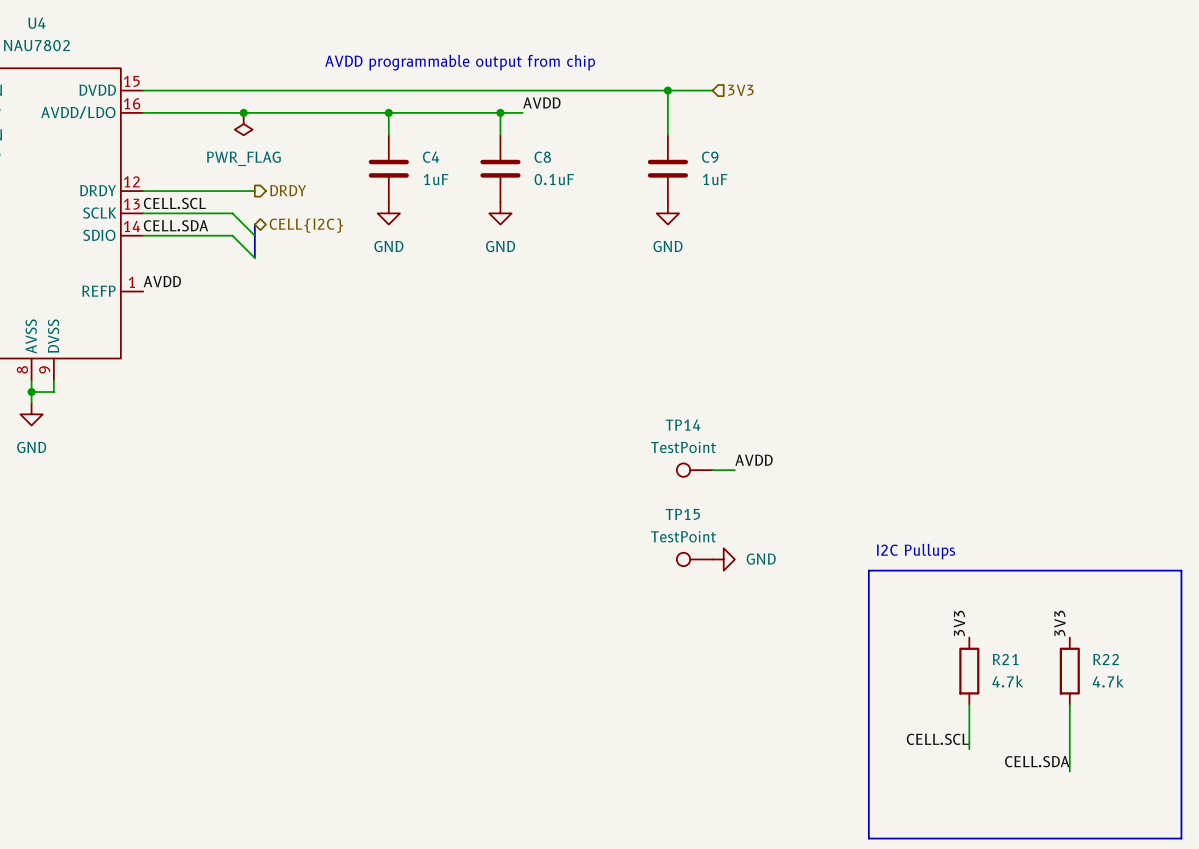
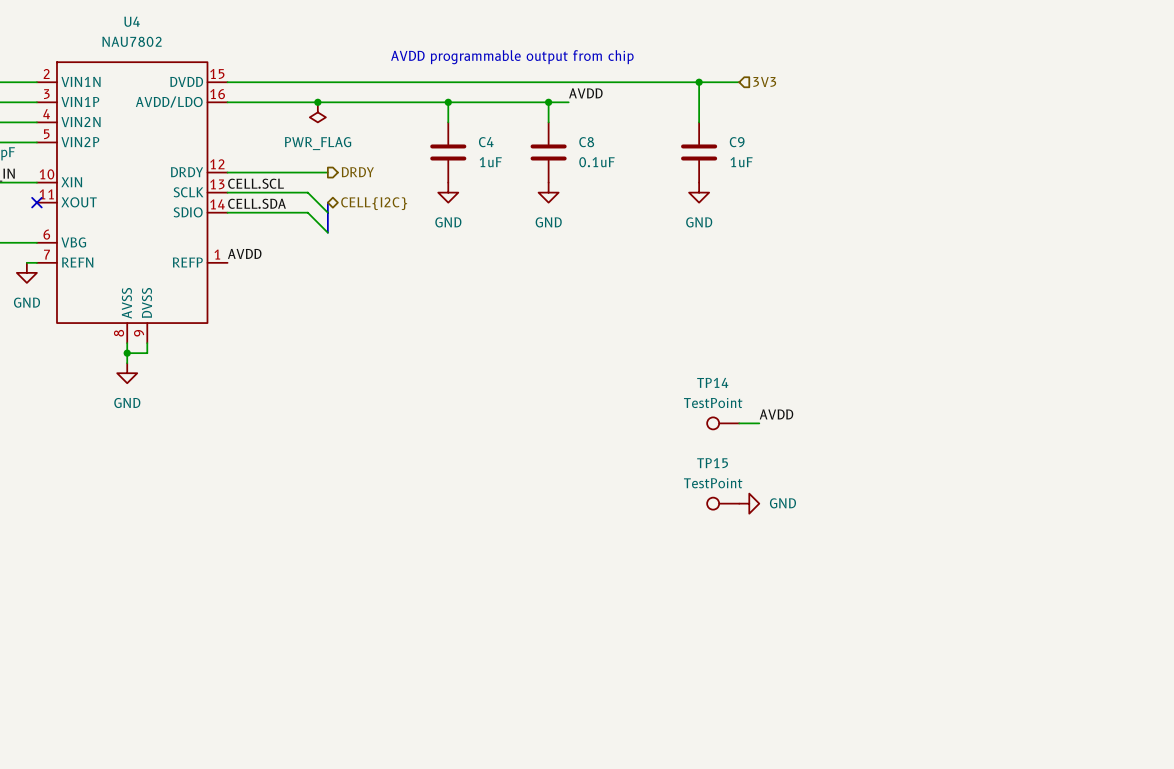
text: I2C Pullups (915, 551) -> none
line: (868, 570) (1181, 570) (1181, 838) (868, 838) (868, 570) -> none
label: 3V3 (959, 623) -> none
label: 3V3 (1059, 623) -> none
R21: 4.7k (969, 671) -> none
R22: 4.7k (1069, 671) -> none
wire: (969, 704) (969, 749) -> none
wire: (1069, 704) (1069, 771) -> none
label: CELL.SCL (937, 739) -> none
label: CELL.SDA (1037, 761) -> none

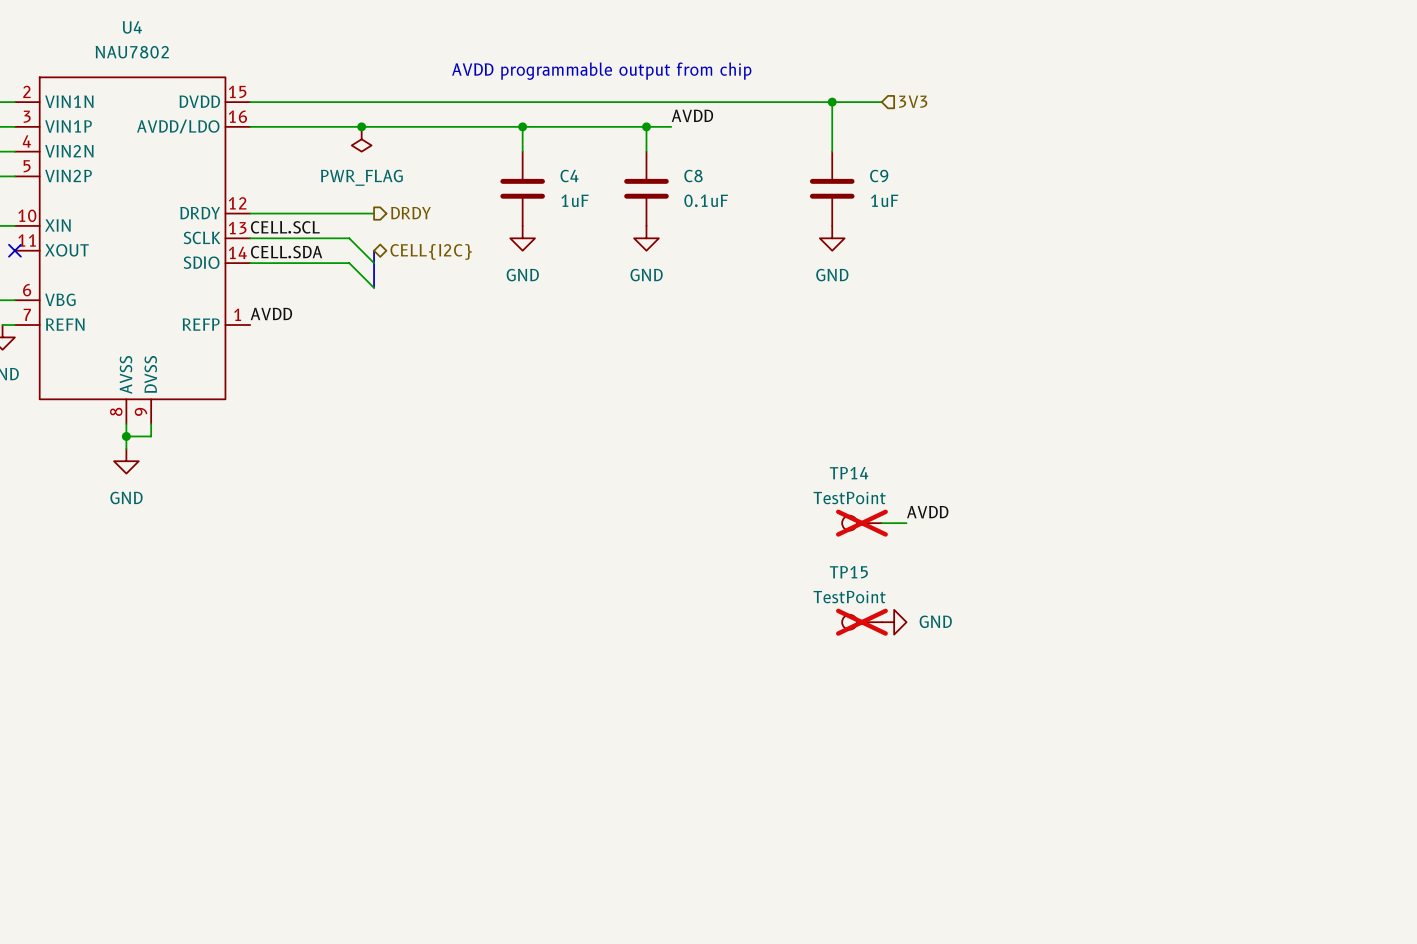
TP14 do-not-place cross: none -> (861, 523)
TP15 do-not-place cross: none -> (861, 622)

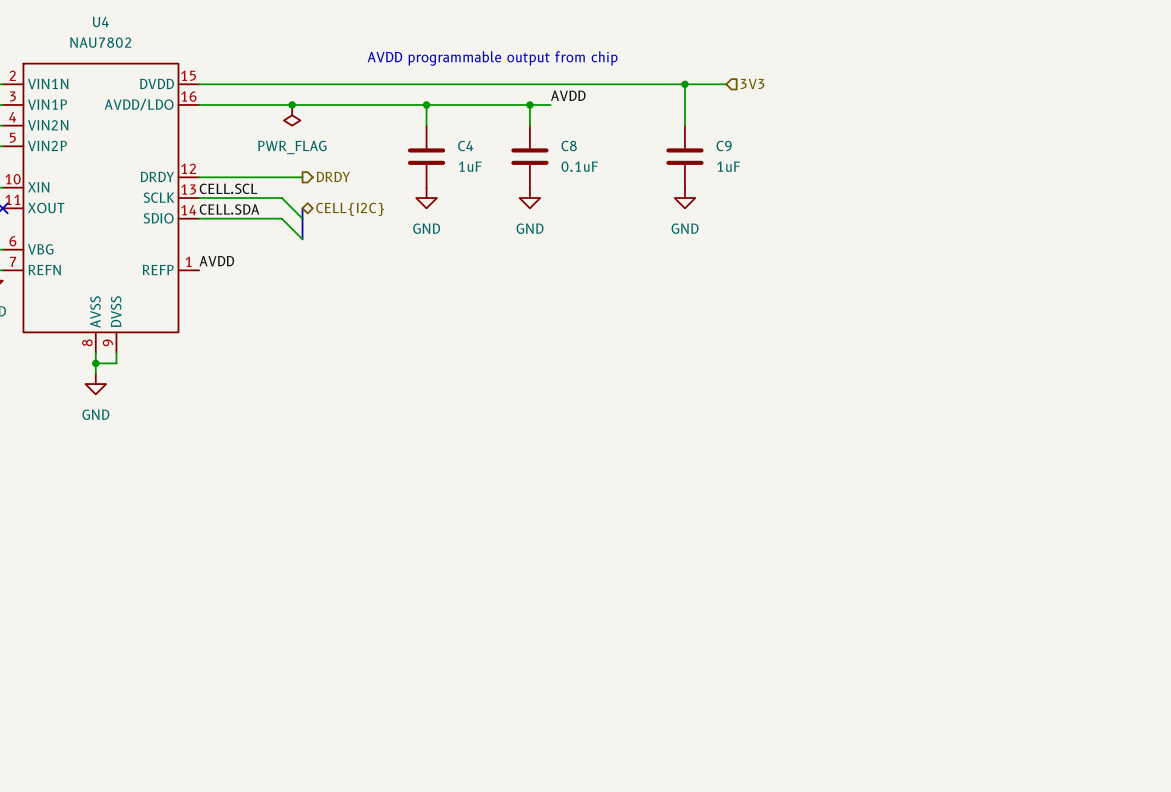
label: AVDD (927, 512) -> none
TP14: TestPoint (861, 523) -> none
wire: (881, 523) (906, 523) -> none
TP15: TestPoint (861, 622) -> none
power symbol: GND (894, 622) -> none

